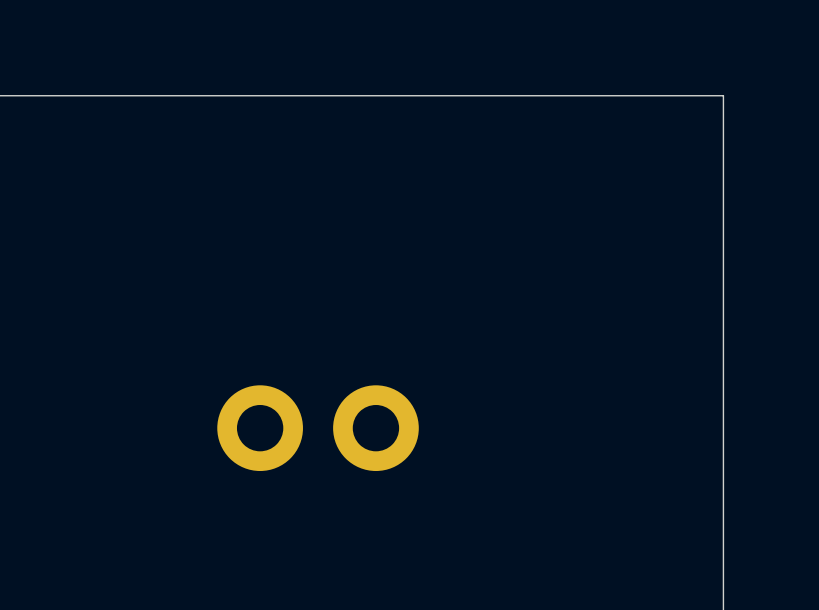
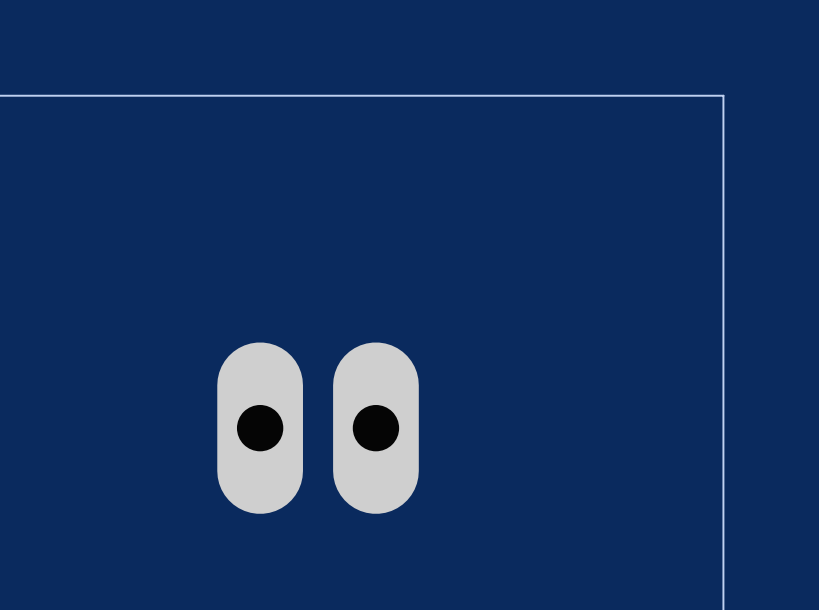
part footprint: [217, 385, 419, 472] -> [217, 342, 419, 514]

